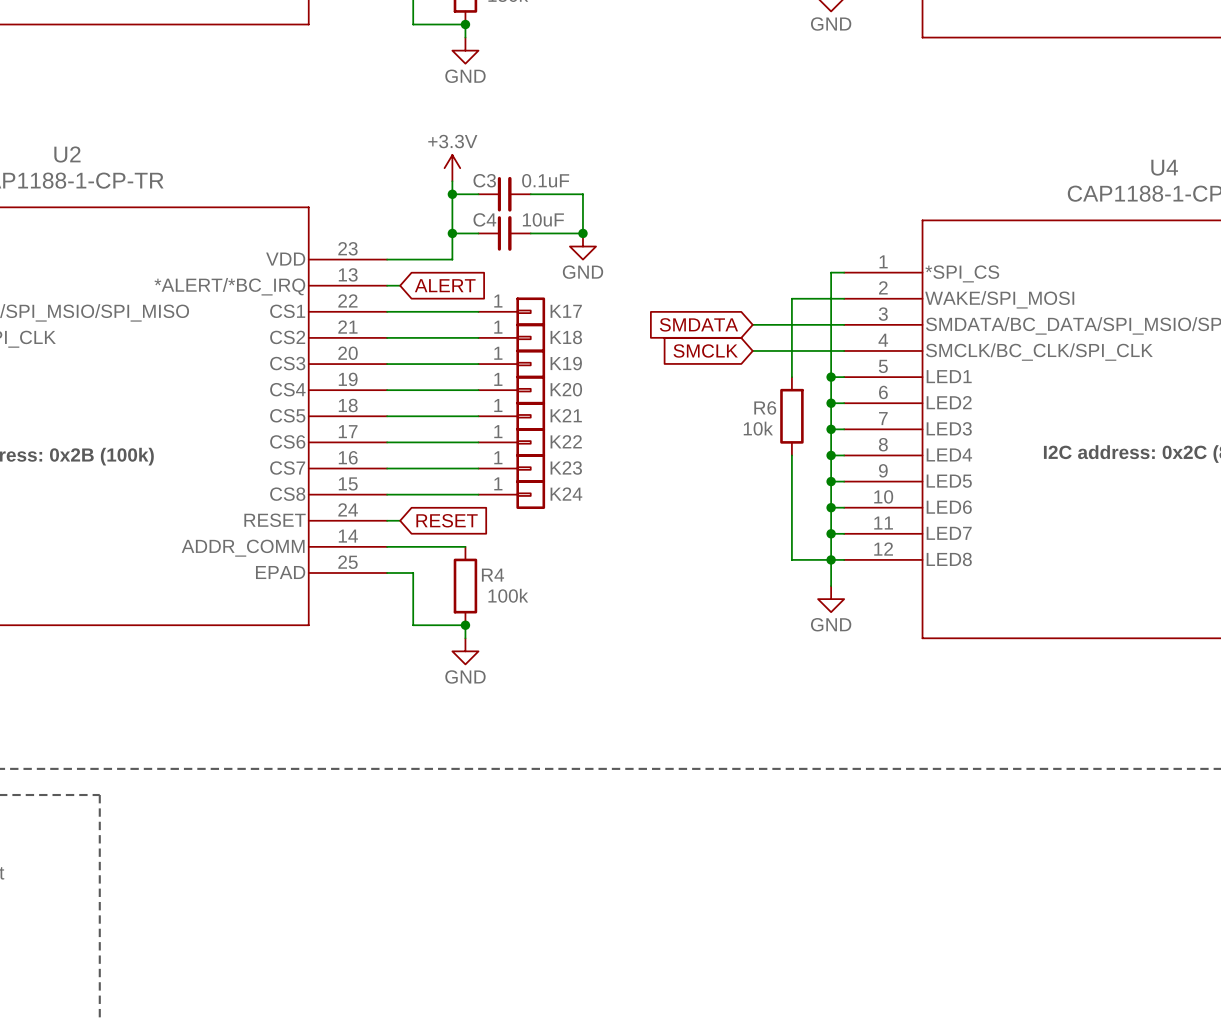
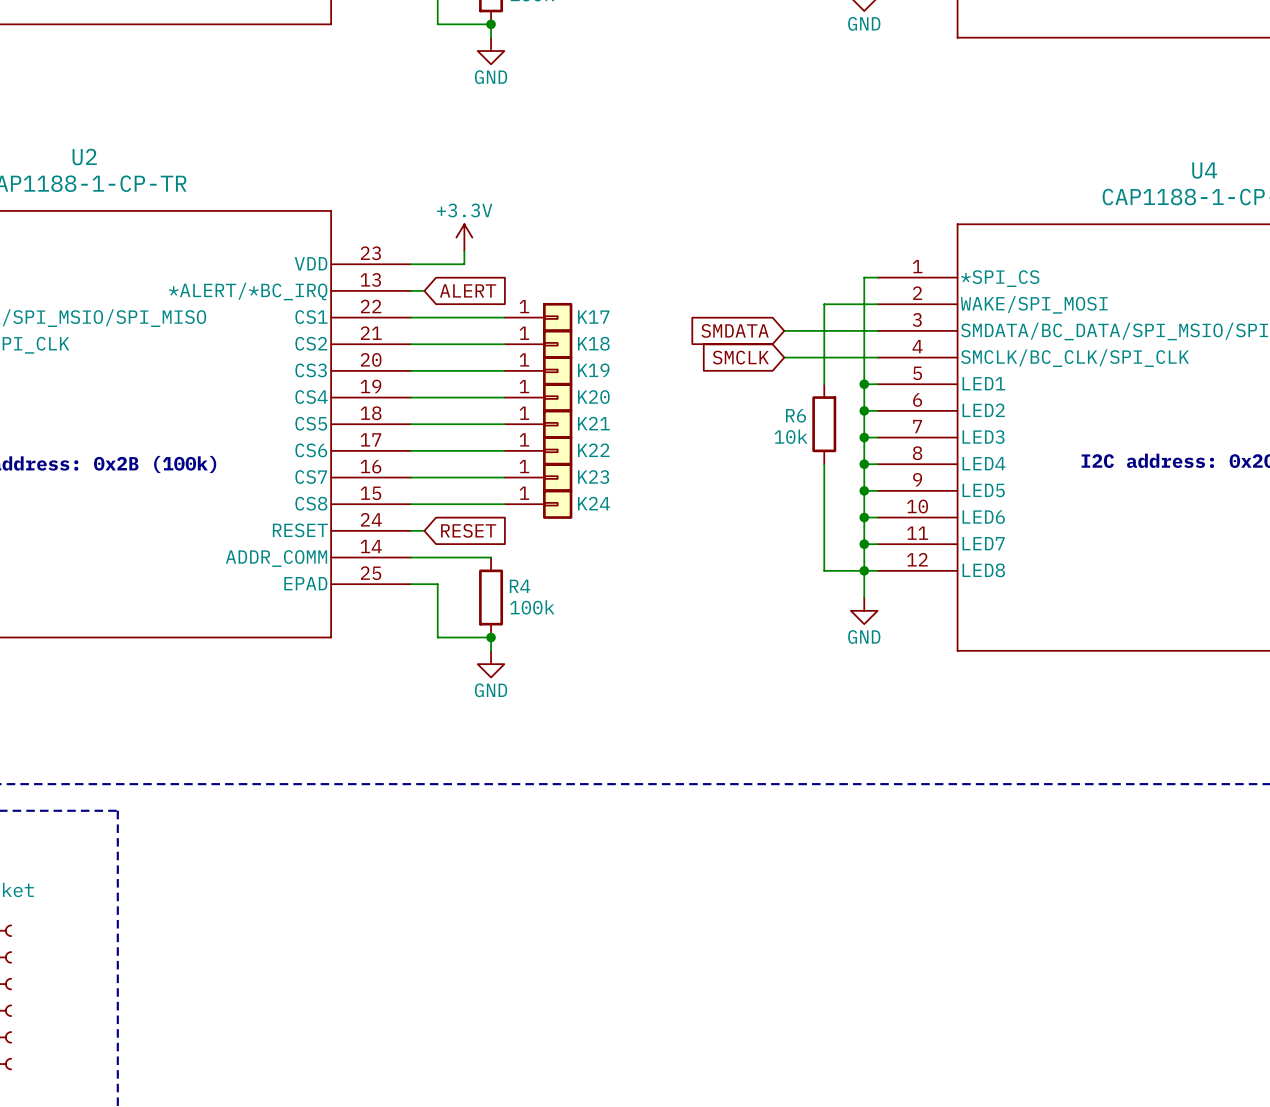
power symbol position: +3.3V (452, 168) -> +3.3V (464, 237)
wire: (452, 181) (452, 259) (439, 259) -> (464, 250) (464, 264)
wire: (452, 194) (478, 194) -> none
junction: (452, 194) -> none
C3: 0.1uF (504, 194) -> none
wire: (530, 194) (582, 194) (582, 233) (530, 233) -> none
wire: (452, 233) (478, 233) -> none
junction: (452, 233) -> none
C4: 10uF (504, 233) -> none
junction: (582, 233) -> none
power symbol: GND (582, 246) -> none

